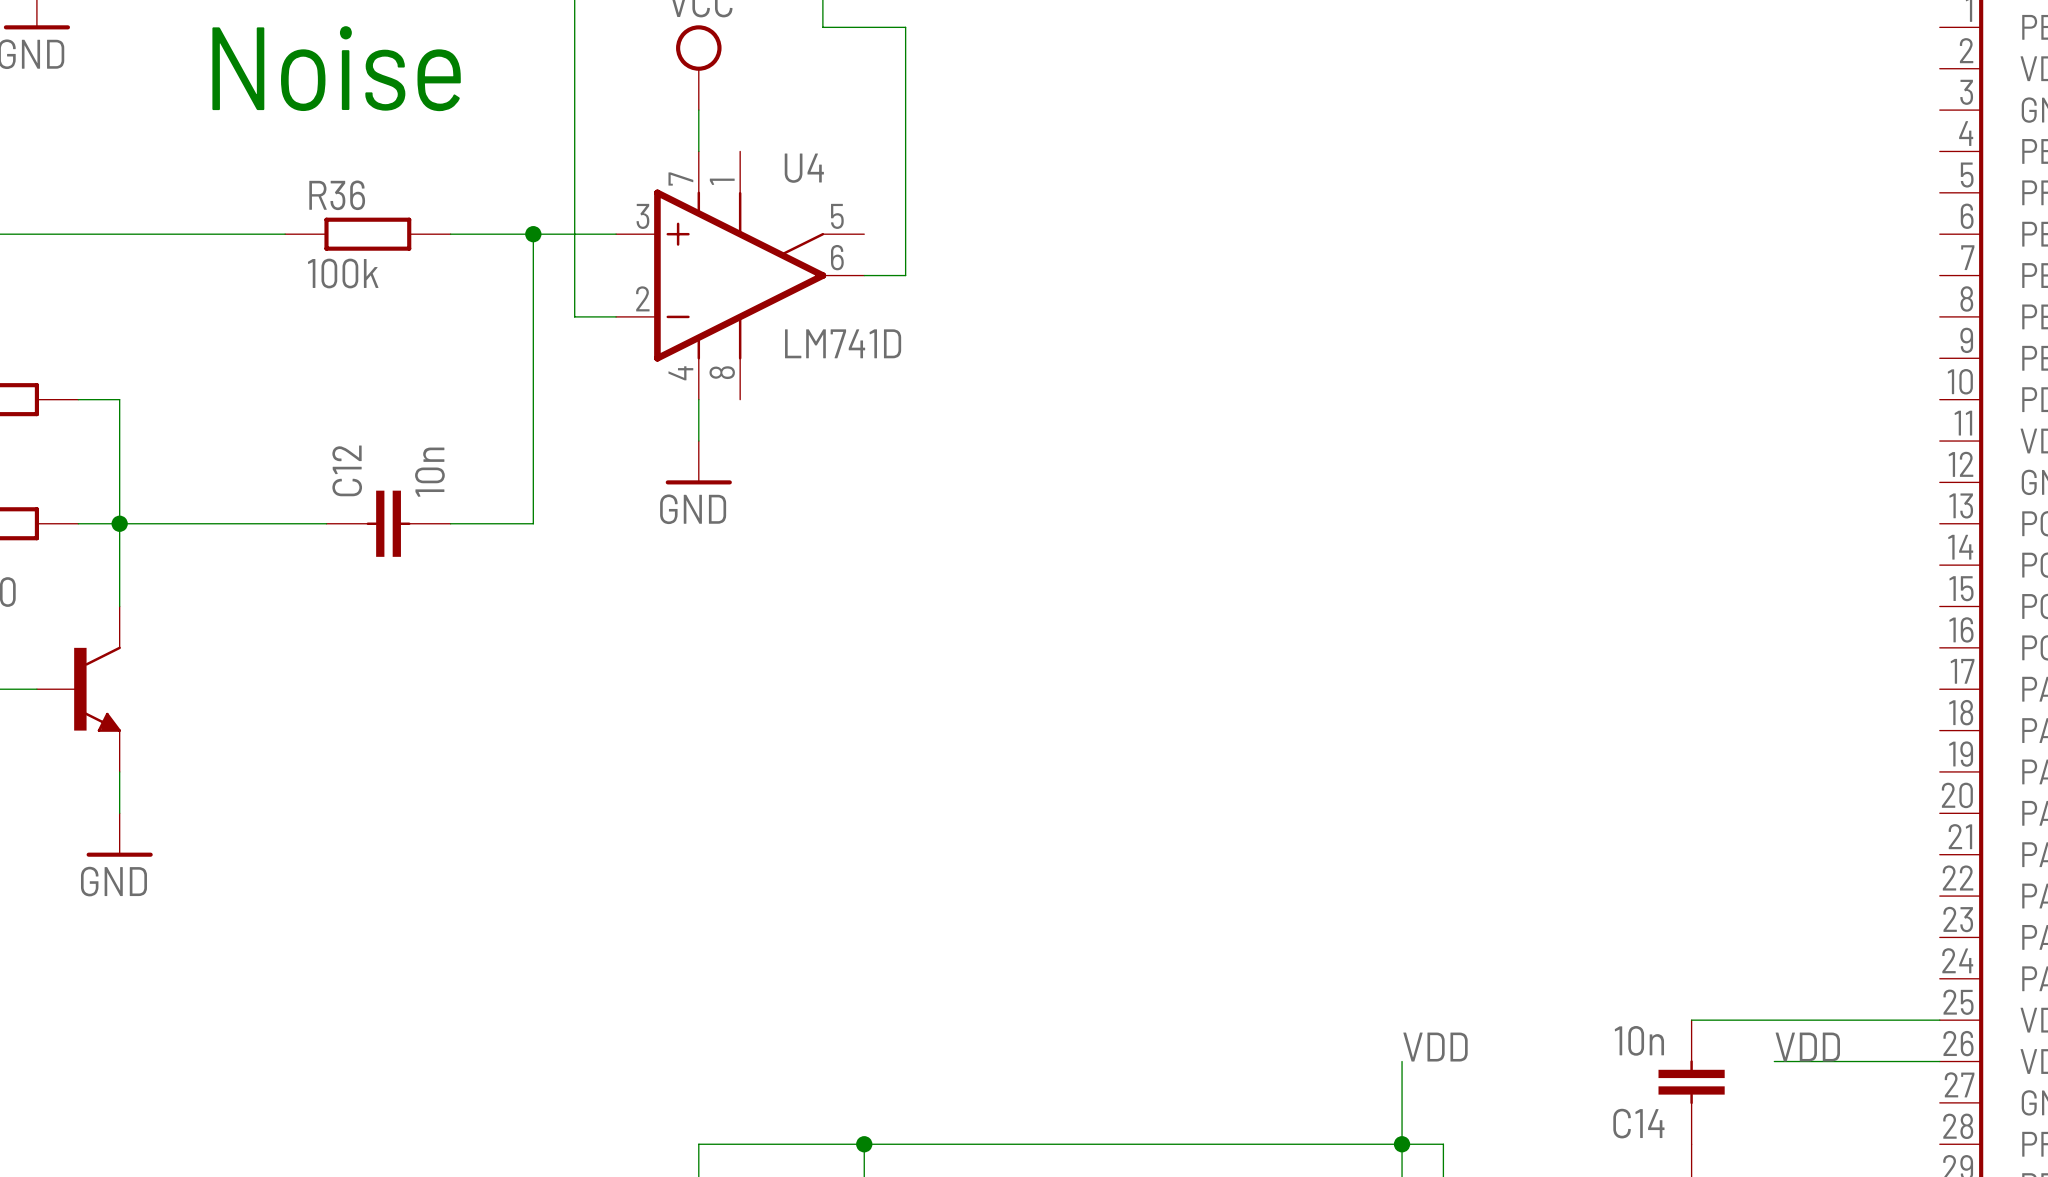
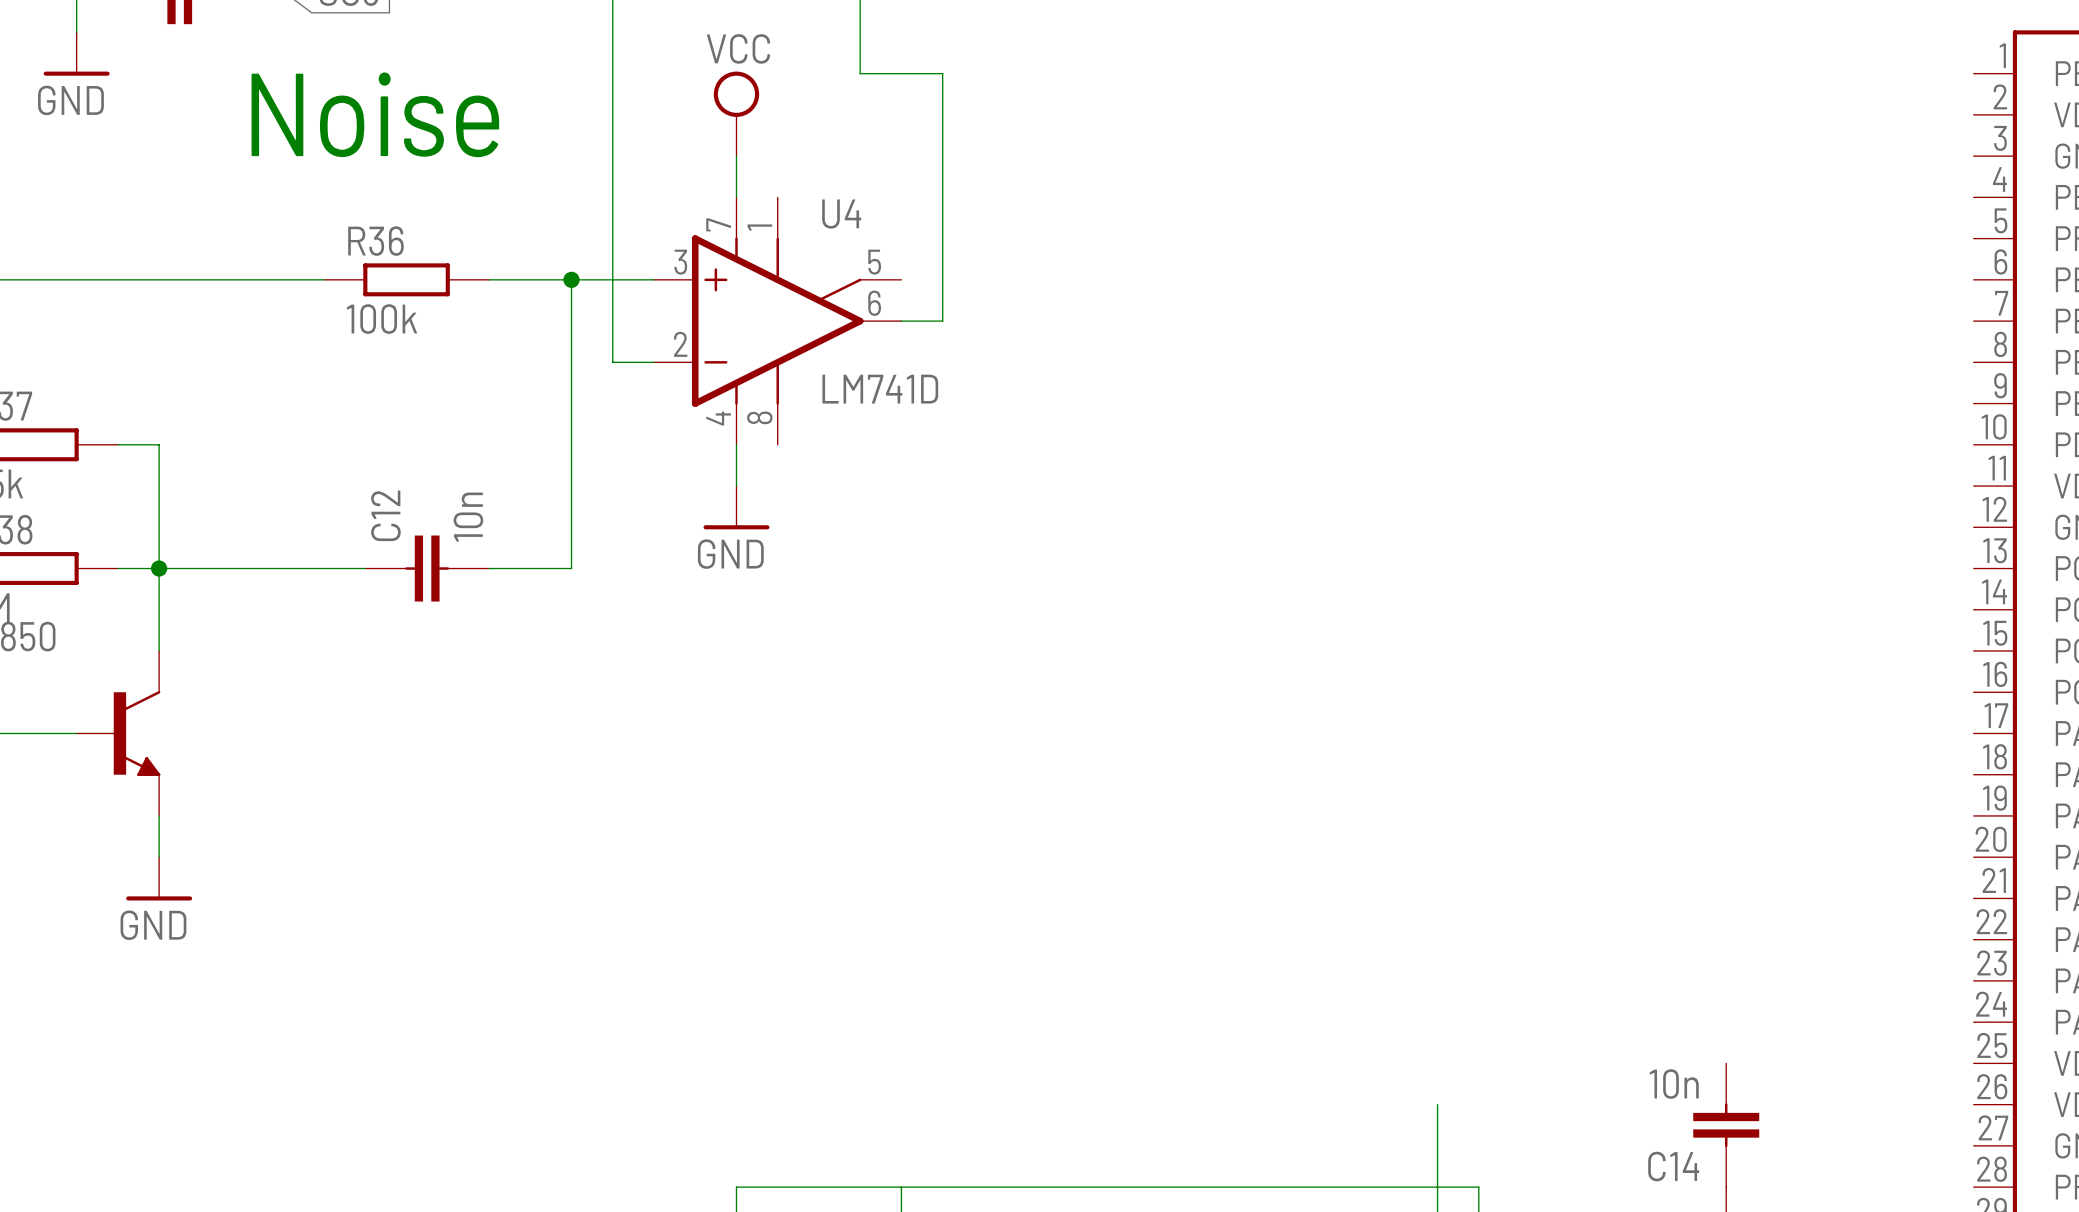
wire: (1691, 1020) (1939, 1020) -> none
label: VDD (1435, 1047) -> none
label: VDD (1807, 1047) -> none
wire: (1774, 1061) (1939, 1061) -> none
junction: (864, 1144) -> none
junction: (1402, 1144) -> none

